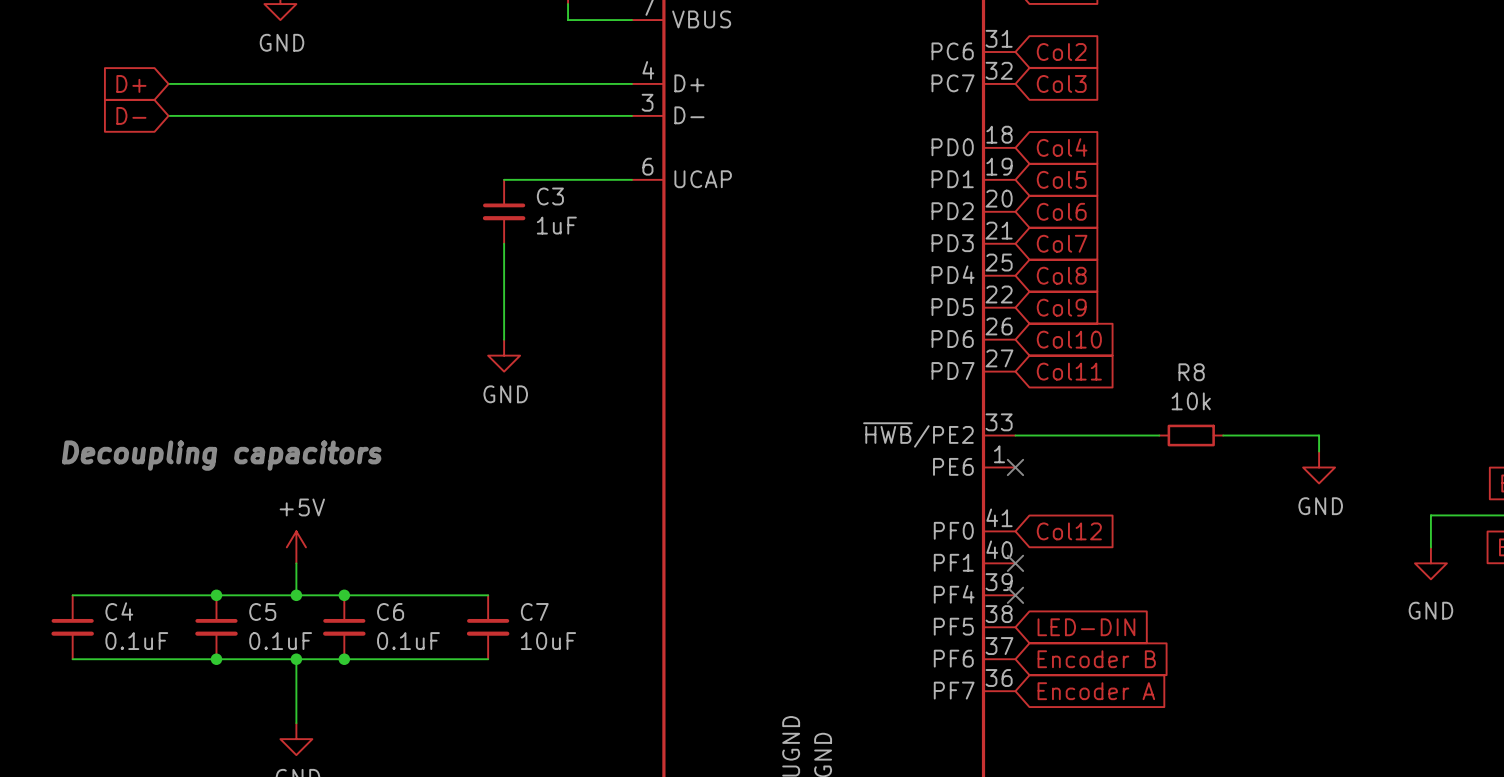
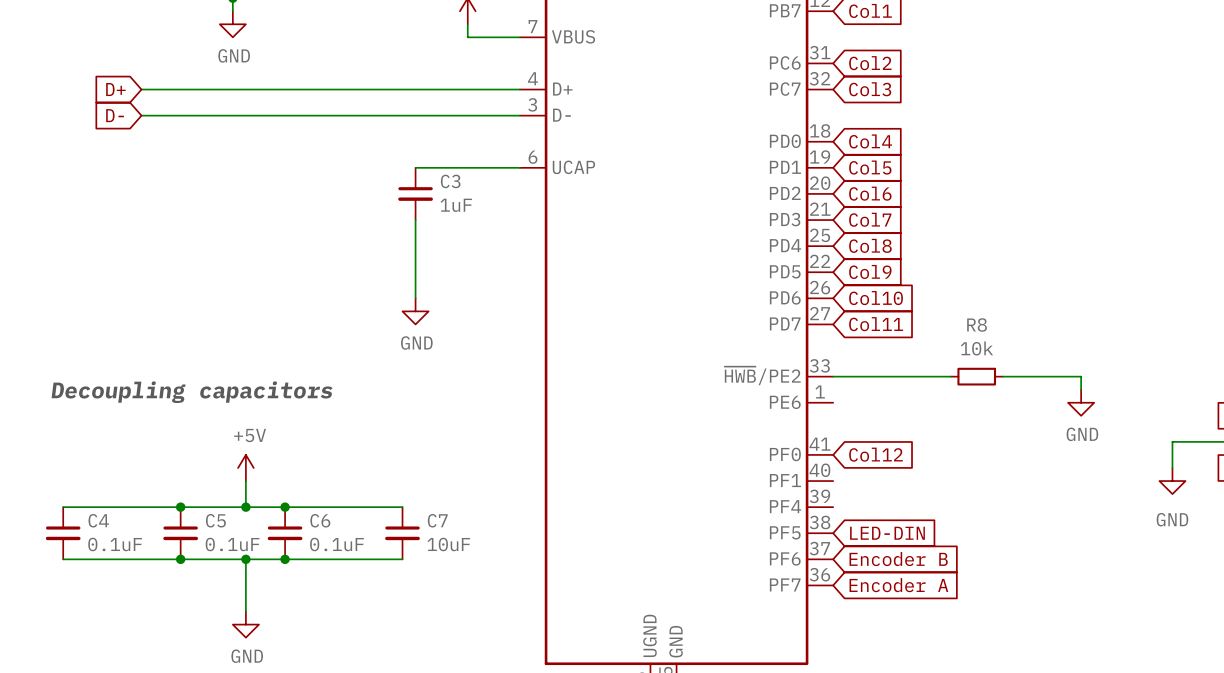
no-connect mark: (1015, 467) -> none
no-connect mark: (1015, 563) -> none
no-connect mark: (1015, 595) -> none

